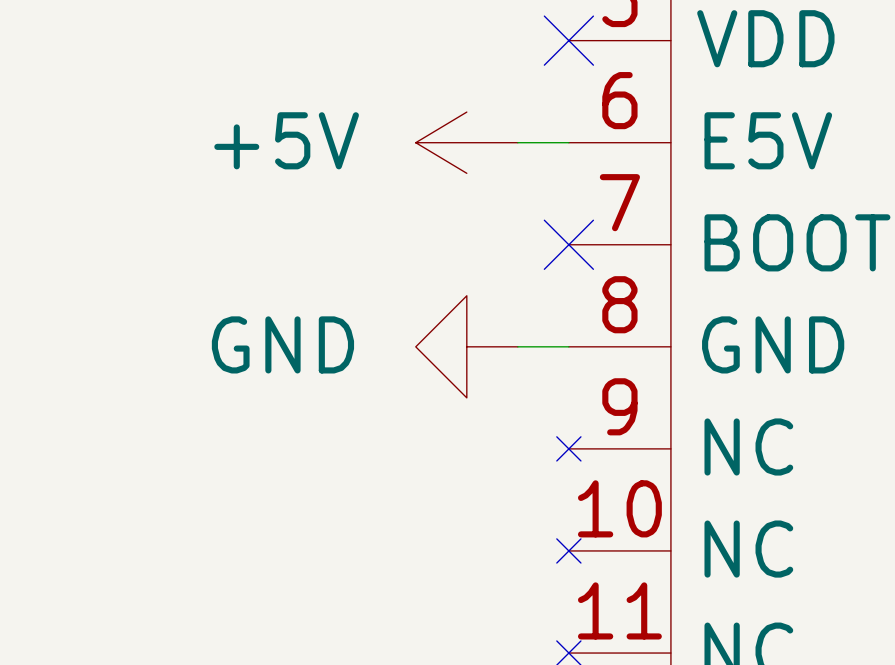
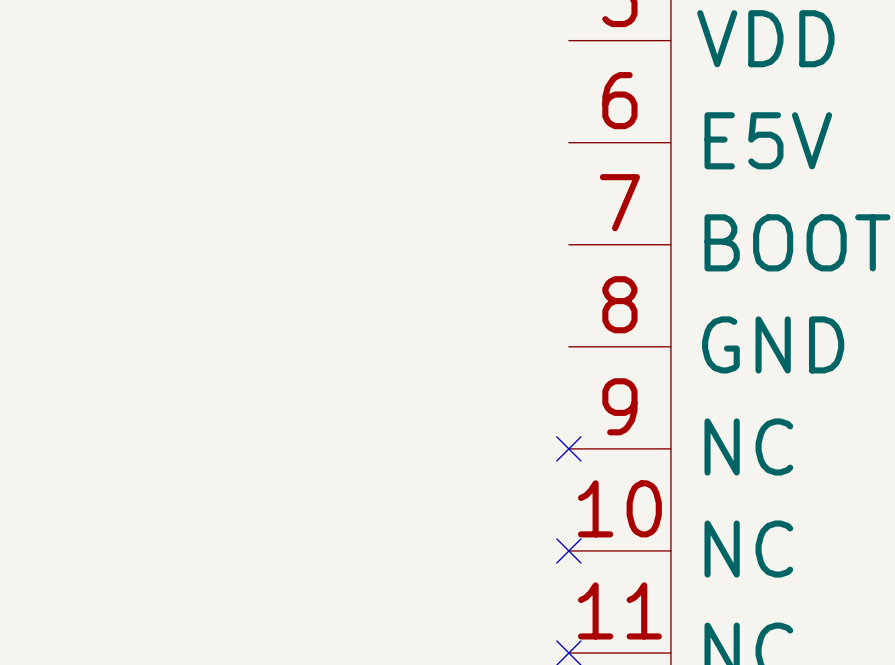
no-connect mark: (568, 40) -> none
power symbol: +5V (466, 142) -> none
wire: (517, 142) (568, 142) -> none
no-connect mark: (568, 244) -> none
power symbol: GND (466, 346) -> none
wire: (517, 346) (568, 346) -> none

